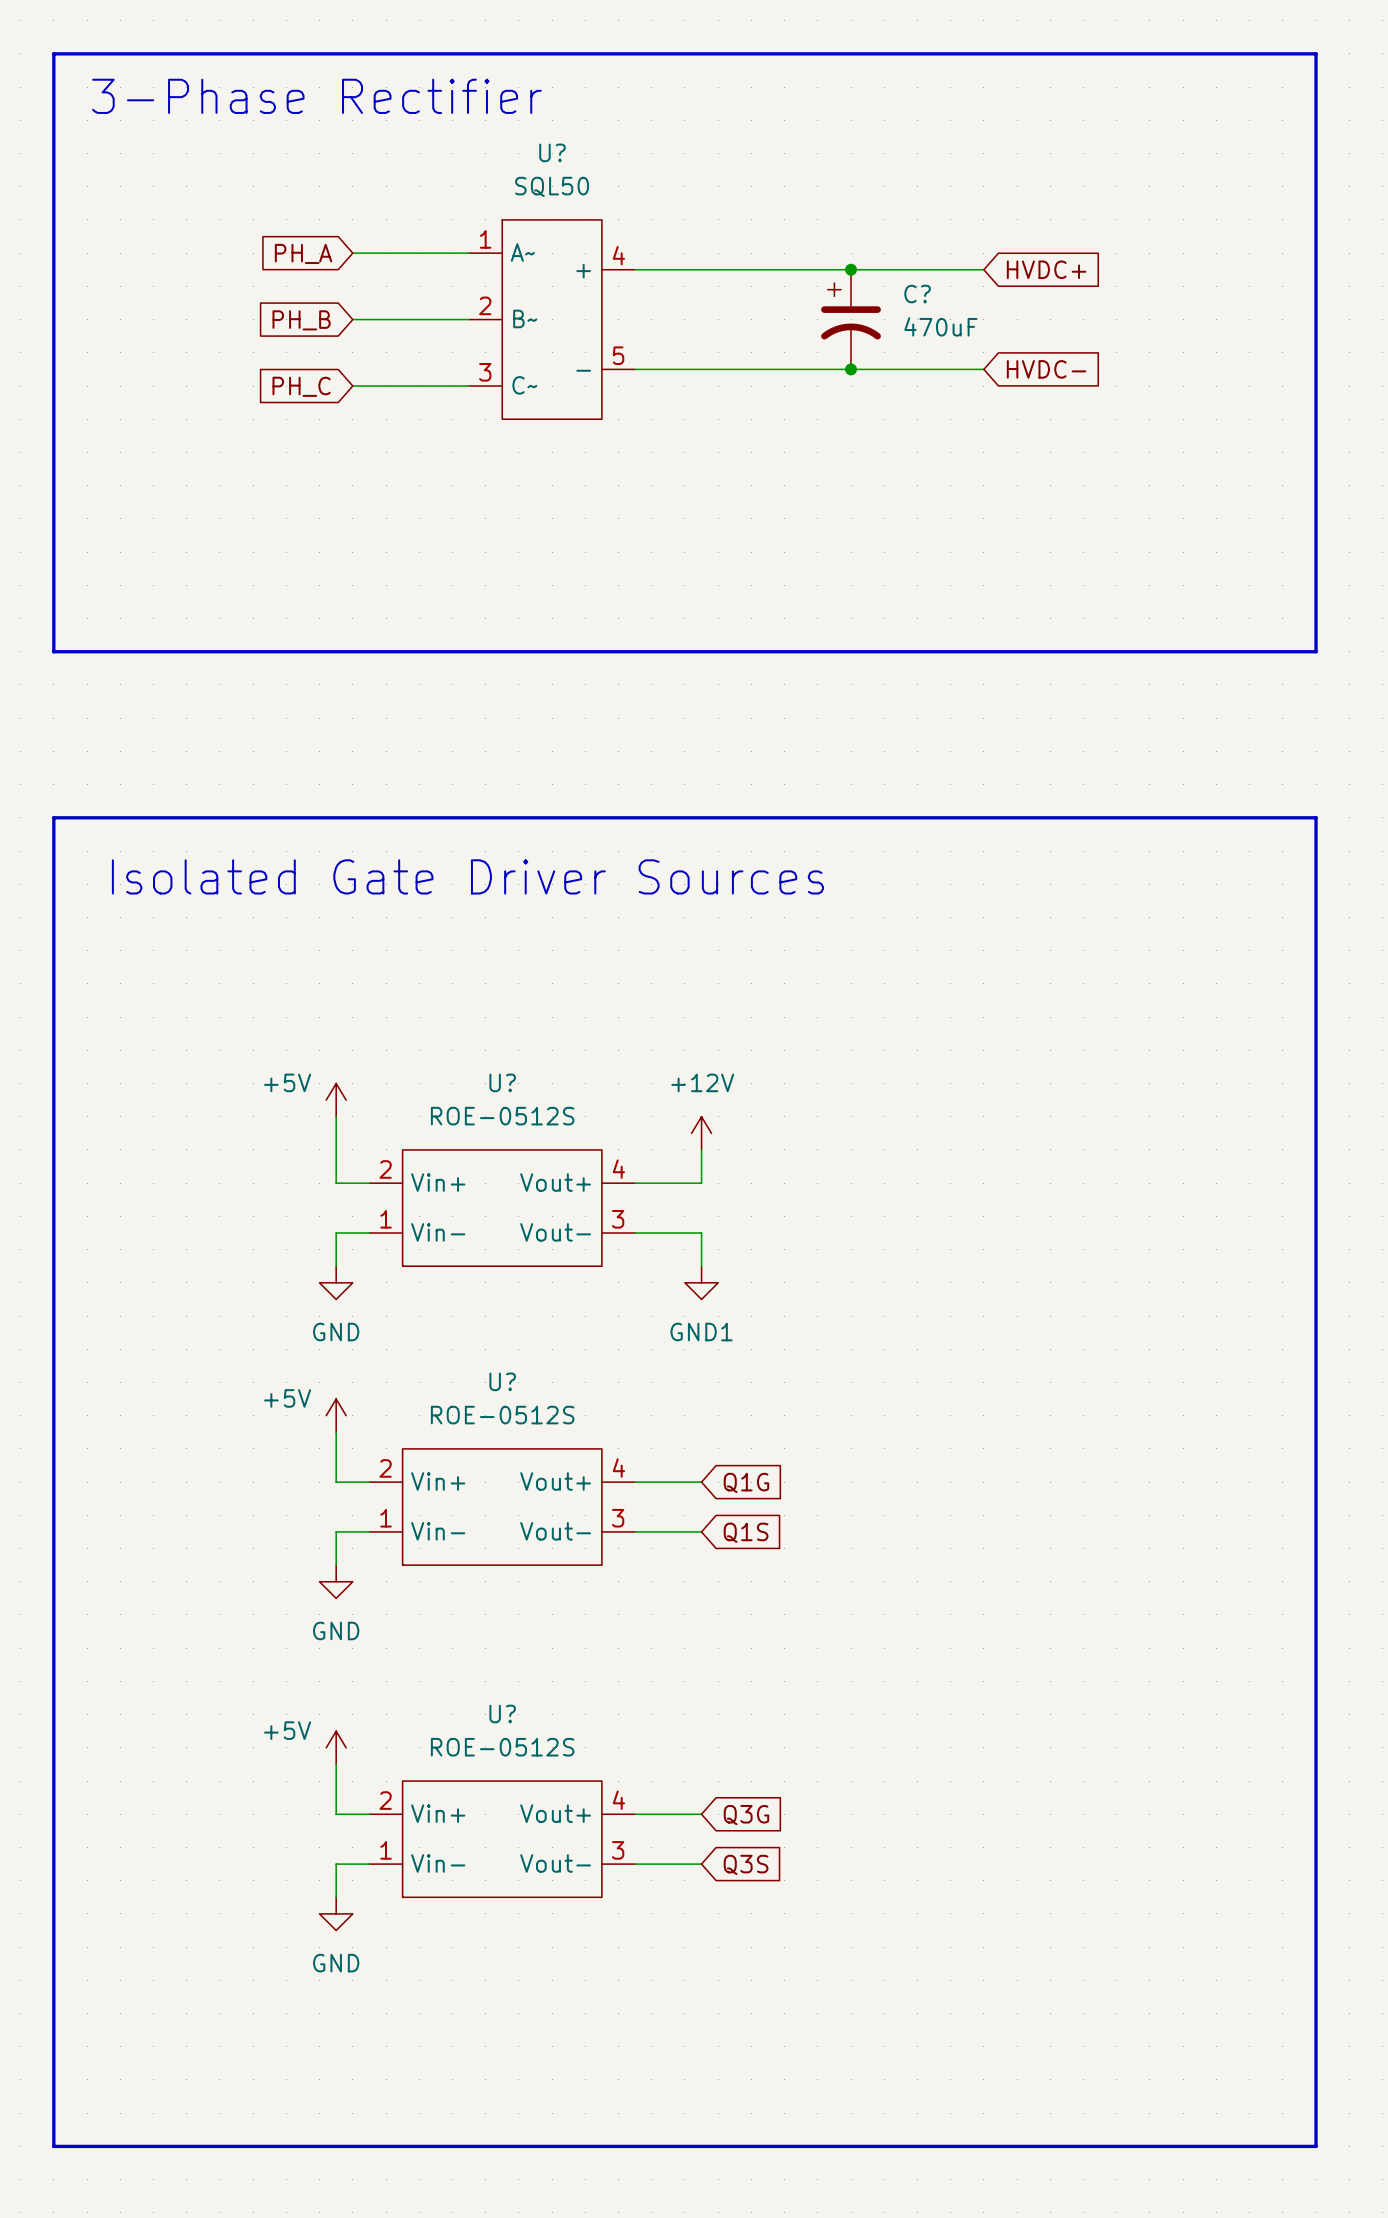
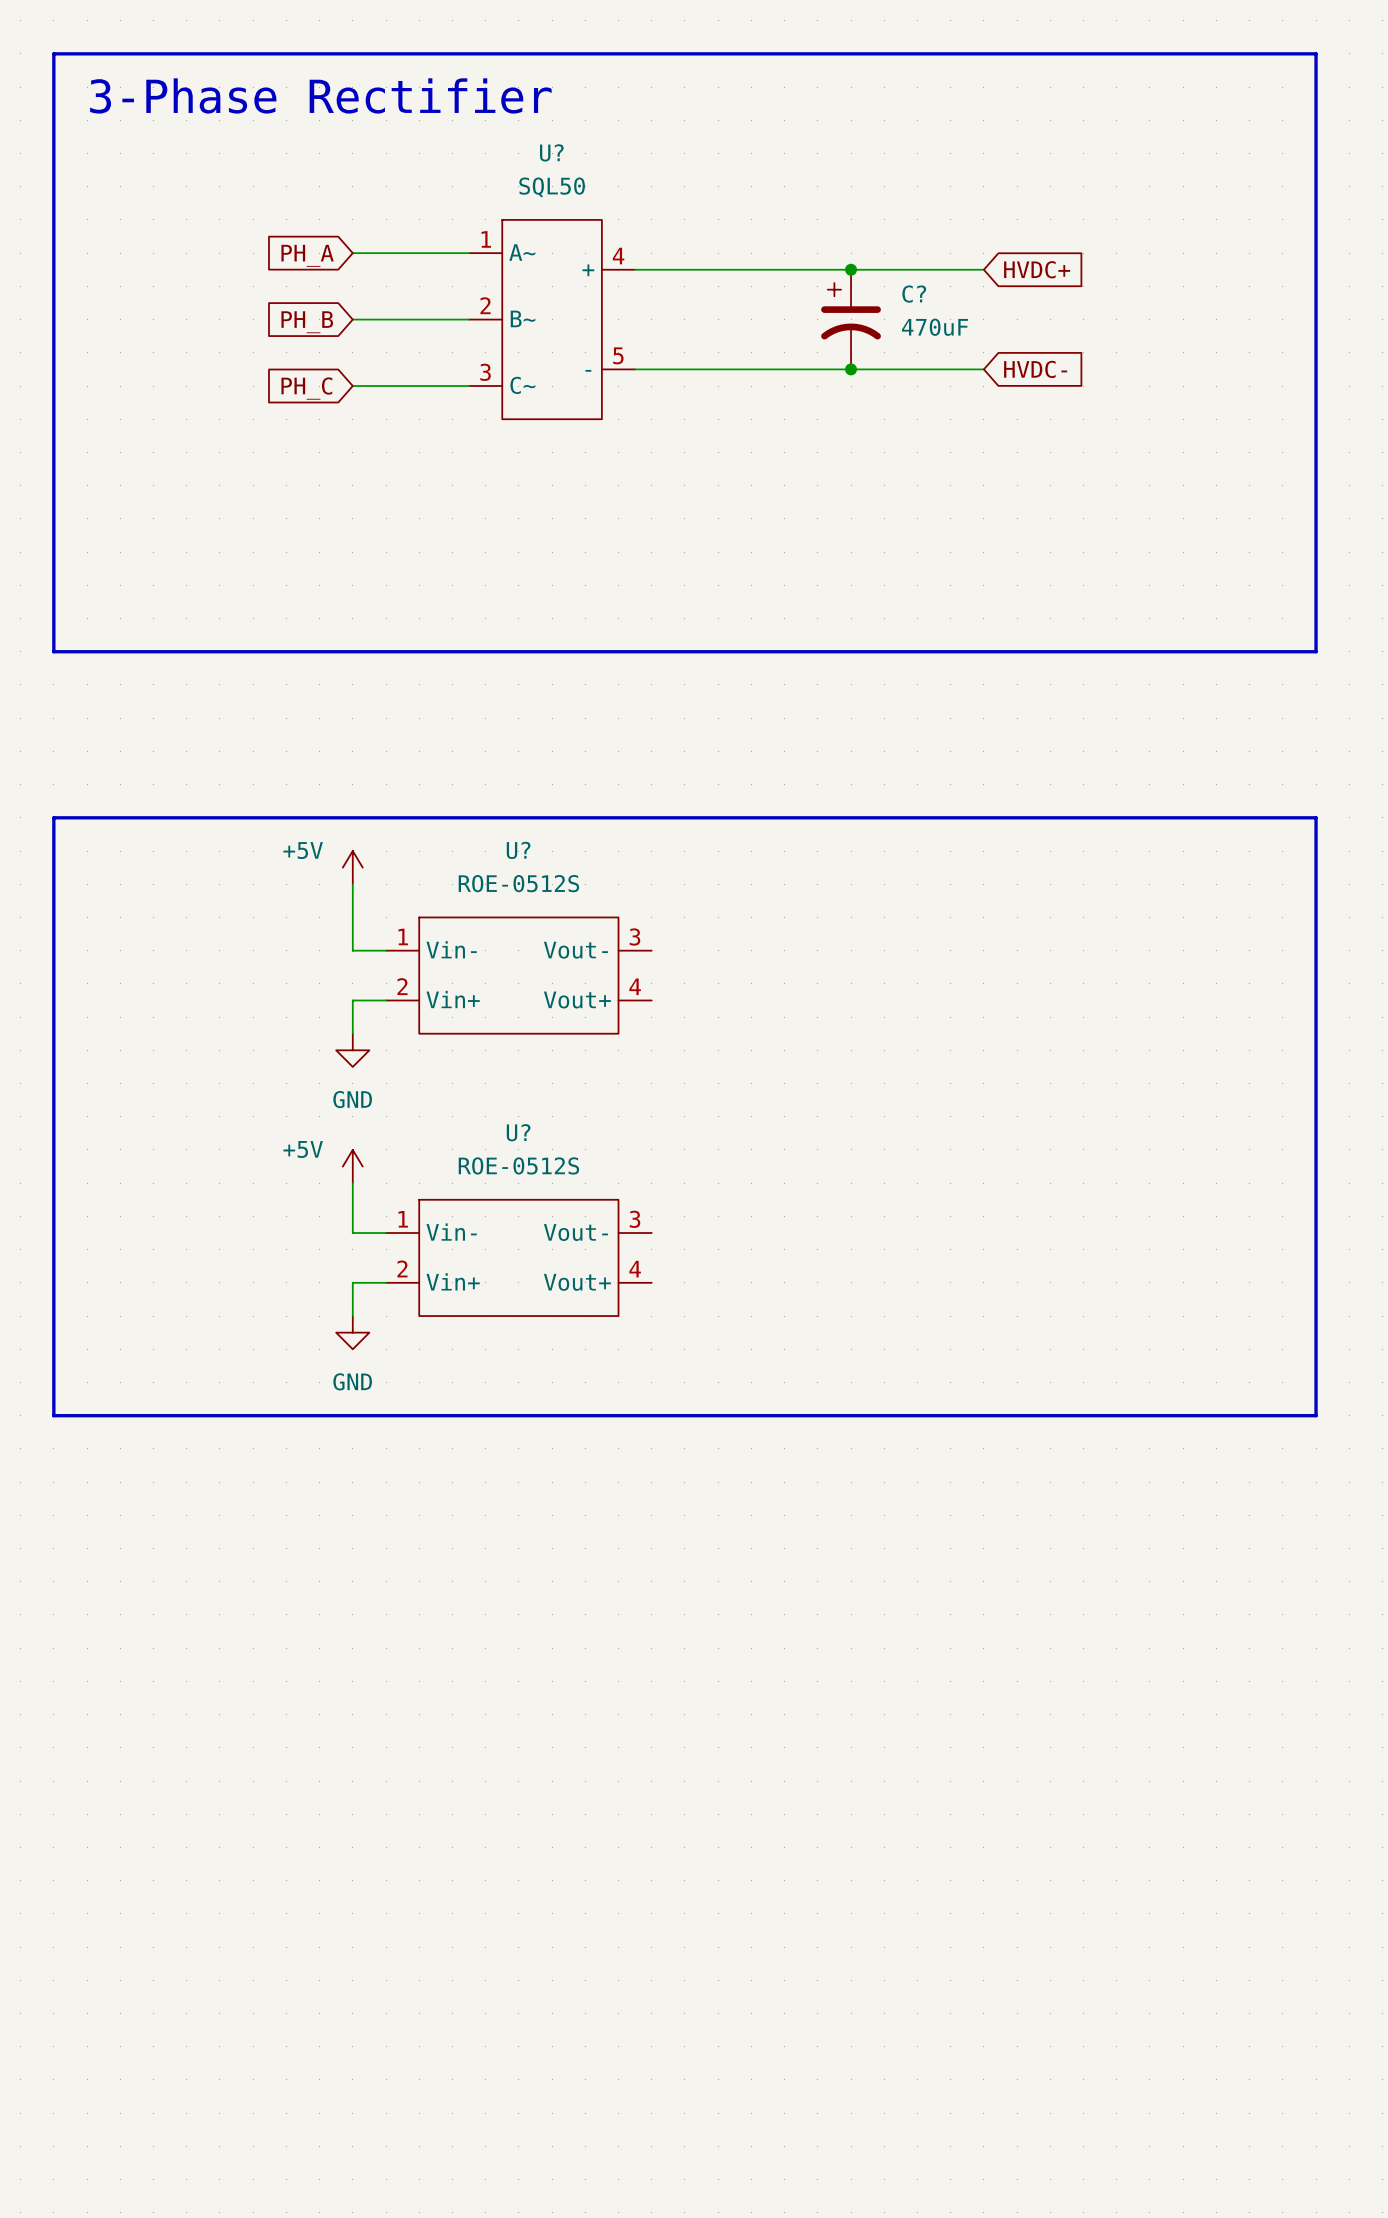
power symbol: none -> +5V (352, 867)
text: Isolated Gate Driver Sources (467, 876) -> none
U?: none -> ROE-0512S (518, 975)
wire: none -> (386, 1000) (352, 1000) (352, 1033)
power symbol: none -> GND (352, 1050)
power symbol position: +5V (336, 1100) -> +5V (352, 1166)
wire: (336, 1116) (336, 1183) (369, 1183) -> (352, 884) (352, 950) (386, 950)
power symbol: +12V (701, 1133) -> none
wire: (701, 1149) (701, 1183) (635, 1183) -> none
U?: ROE-0512S (502, 1208) -> none
wire: (352, 1233) (336, 1233) (336, 1266) -> (352, 1233) (352, 1183)
wire: (635, 1233) (701, 1233) (701, 1266) -> none
U?: none -> ROE-0512S (518, 1257)
power symbol position: GND (336, 1282) -> GND (352, 1332)
power symbol: GND1 (701, 1282) -> none
line: (53, 1415) (53, 2146) (1316, 2146) (1316, 1415) -> (53, 1415) (1316, 1415)
power symbol: +5V (336, 1415) -> none
wire: (336, 1432) (336, 1482) (369, 1482) -> none
wire: (635, 1482) (701, 1482) -> none
global label: Q1G (746, 1482) -> none
U?: ROE-0512S (502, 1507) -> none
wire: (369, 1531) (336, 1531) (336, 1565) -> (386, 1282) (352, 1282) (352, 1316)
wire: (635, 1531) (701, 1531) -> none
global label: Q1S (746, 1532) -> none
power symbol: GND (336, 1581) -> none
power symbol: +5V (336, 1747) -> none
wire: (336, 1764) (336, 1814) (369, 1814) -> none
wire: (635, 1814) (701, 1814) -> none
global label: Q3G (746, 1815) -> none
U?: ROE-0512S (502, 1839) -> none
wire: (369, 1864) (336, 1864) (336, 1897) -> none
wire: (635, 1864) (701, 1864) -> none
global label: Q3S (746, 1864) -> none
power symbol: GND (336, 1913) -> none

